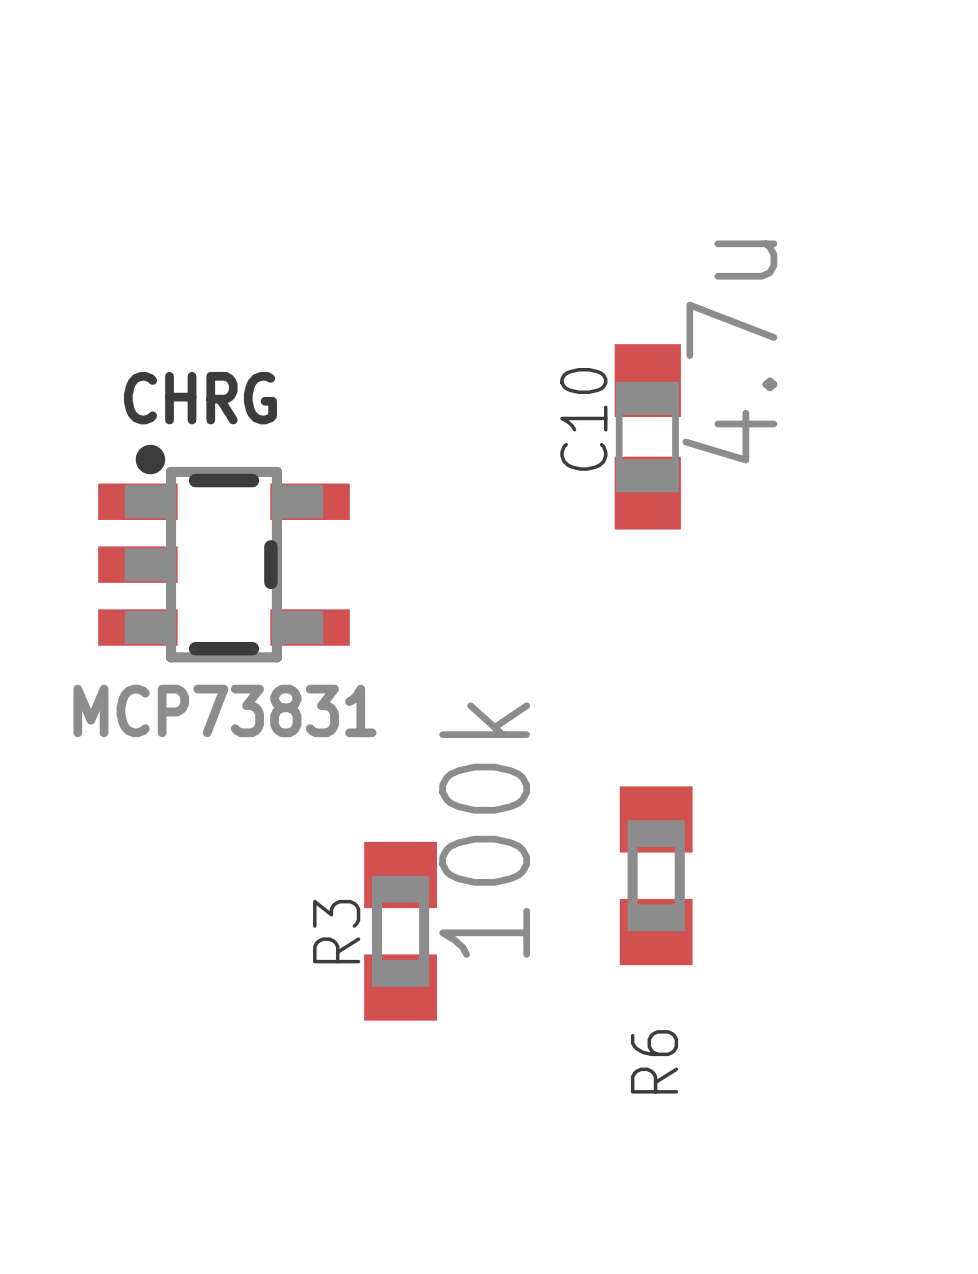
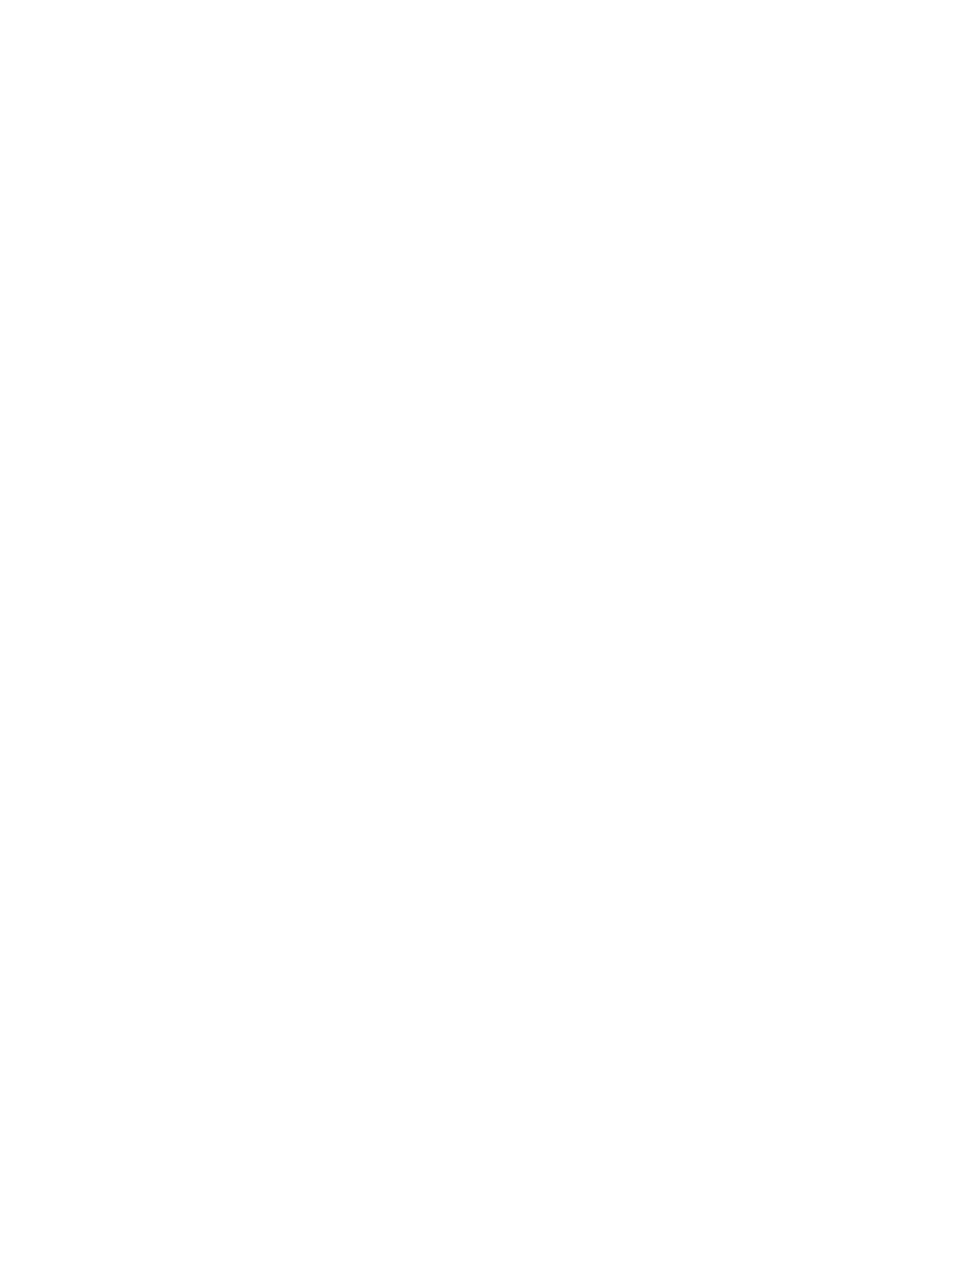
C10: 4.7u (647, 436) -> none
CHRG: MCP73831 (223, 553) -> none
R6: (656, 875) -> none
R3: 100k (400, 931) -> none

